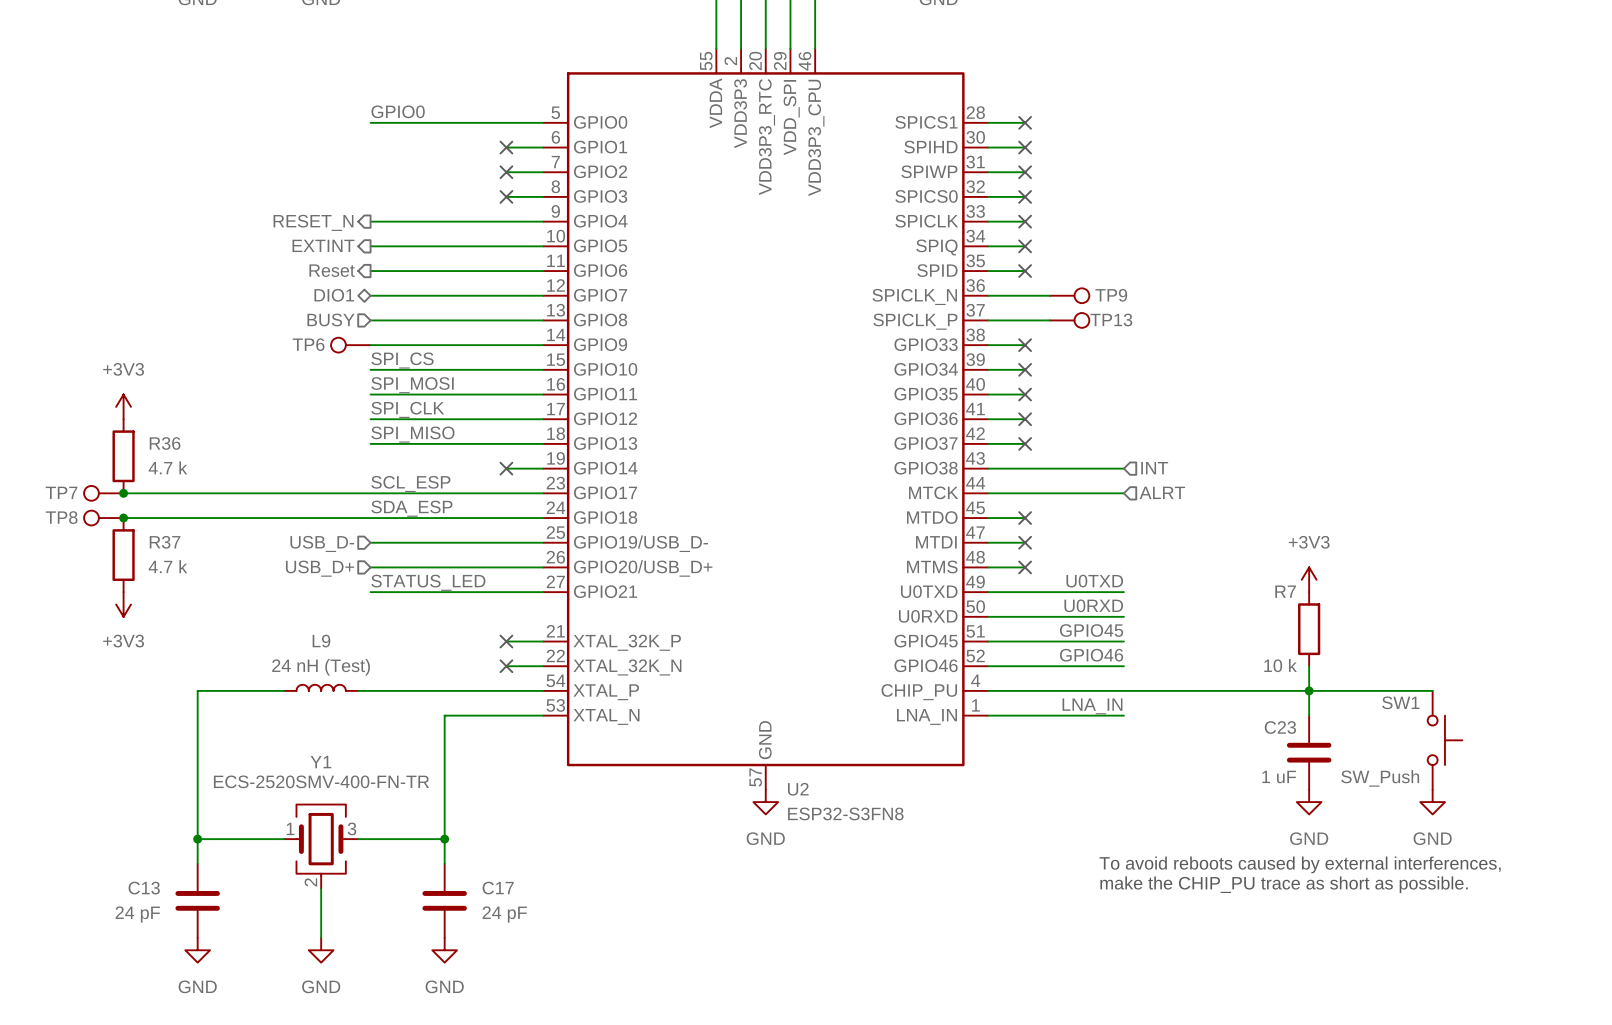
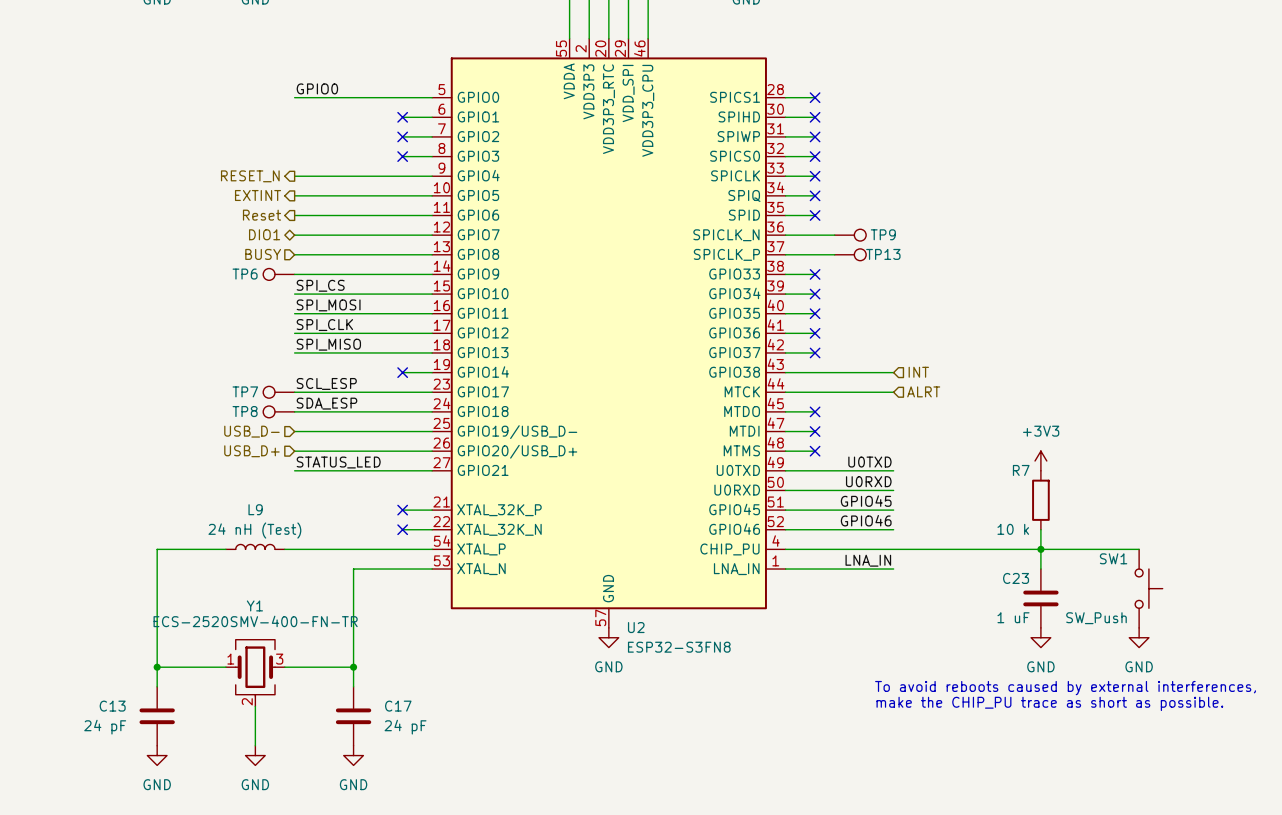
power symbol: +3V3 (123, 406) -> none
R36: 4.7 k (123, 456) -> none
TP7 position: (103, 493) -> (278, 392)
wire: (123, 493) (370, 493) -> none
junction: (123, 493) -> none
TP8 position: (103, 518) -> (278, 411)
wire: (123, 518) (370, 518) -> none
junction: (123, 518) -> none
R37: 4.7 k (123, 555) -> none
power symbol: +3V3 (123, 604) -> none

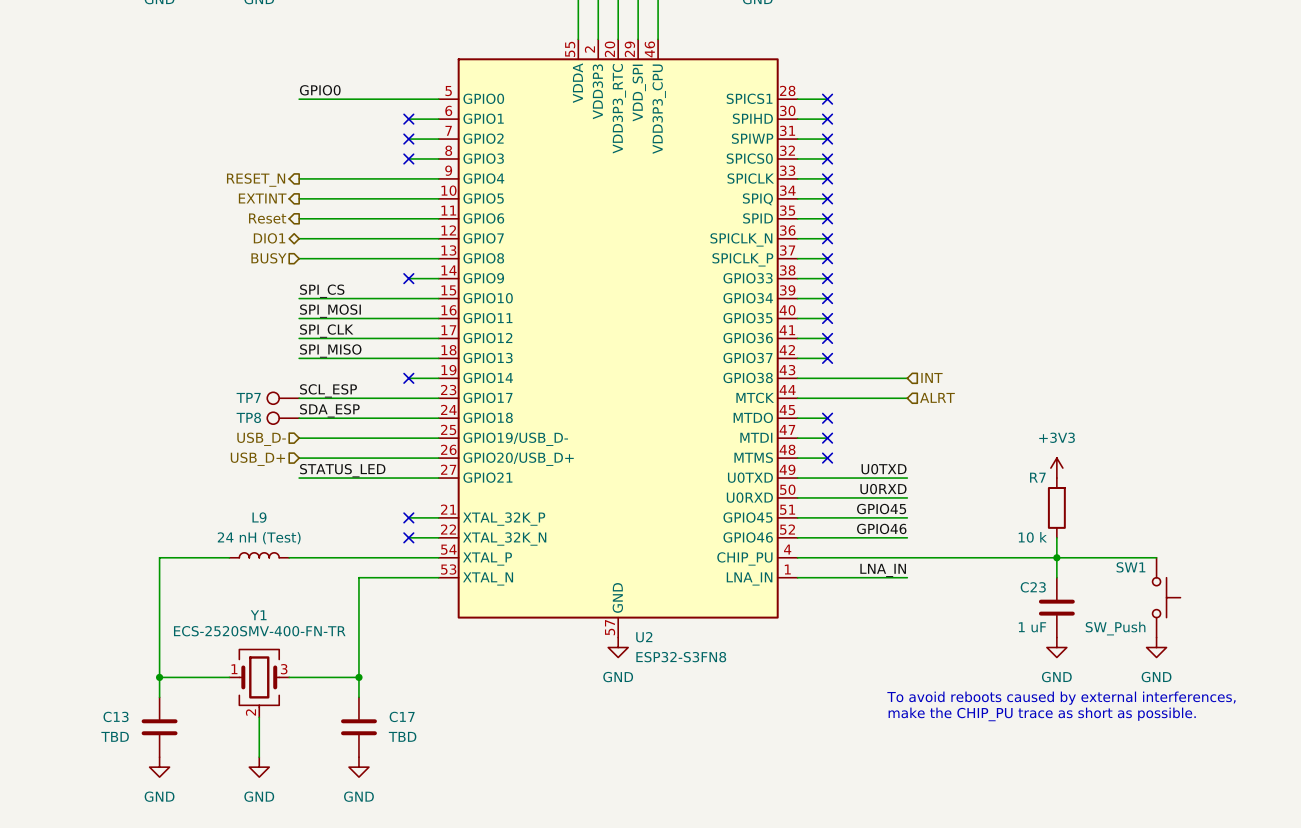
wire: (815, 235) (834, 235) -> none
no-connect mark: none -> (827, 238)
TP9: (850, 235) -> none
wire: (815, 254) (834, 254) -> none
no-connect mark: none -> (827, 258)
TP13: (850, 254) -> none
TP6: (278, 274) -> none
wire: (294, 274) (402, 274) -> none
no-connect mark: none -> (408, 278)
C13 value: 24 pF (105, 727) -> TBD (115, 736)
C17 value: 24 pF (405, 727) -> TBD (402, 736)

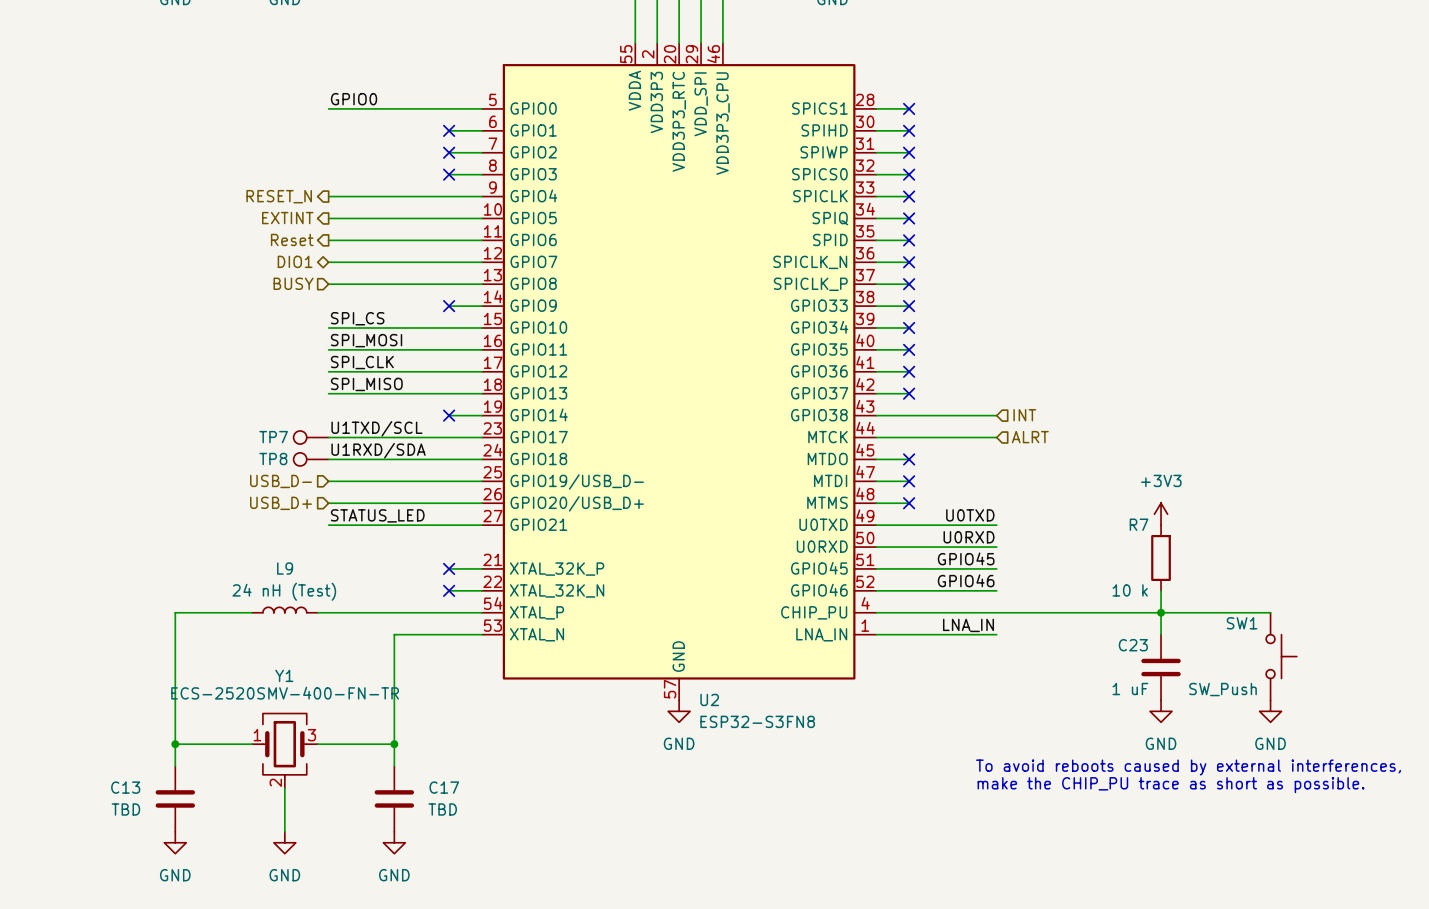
label: SCL_ESP (328, 390) -> U1TXD/SCL (376, 428)
label: SDA_ESP (329, 410) -> U1RXD/SDA (378, 450)

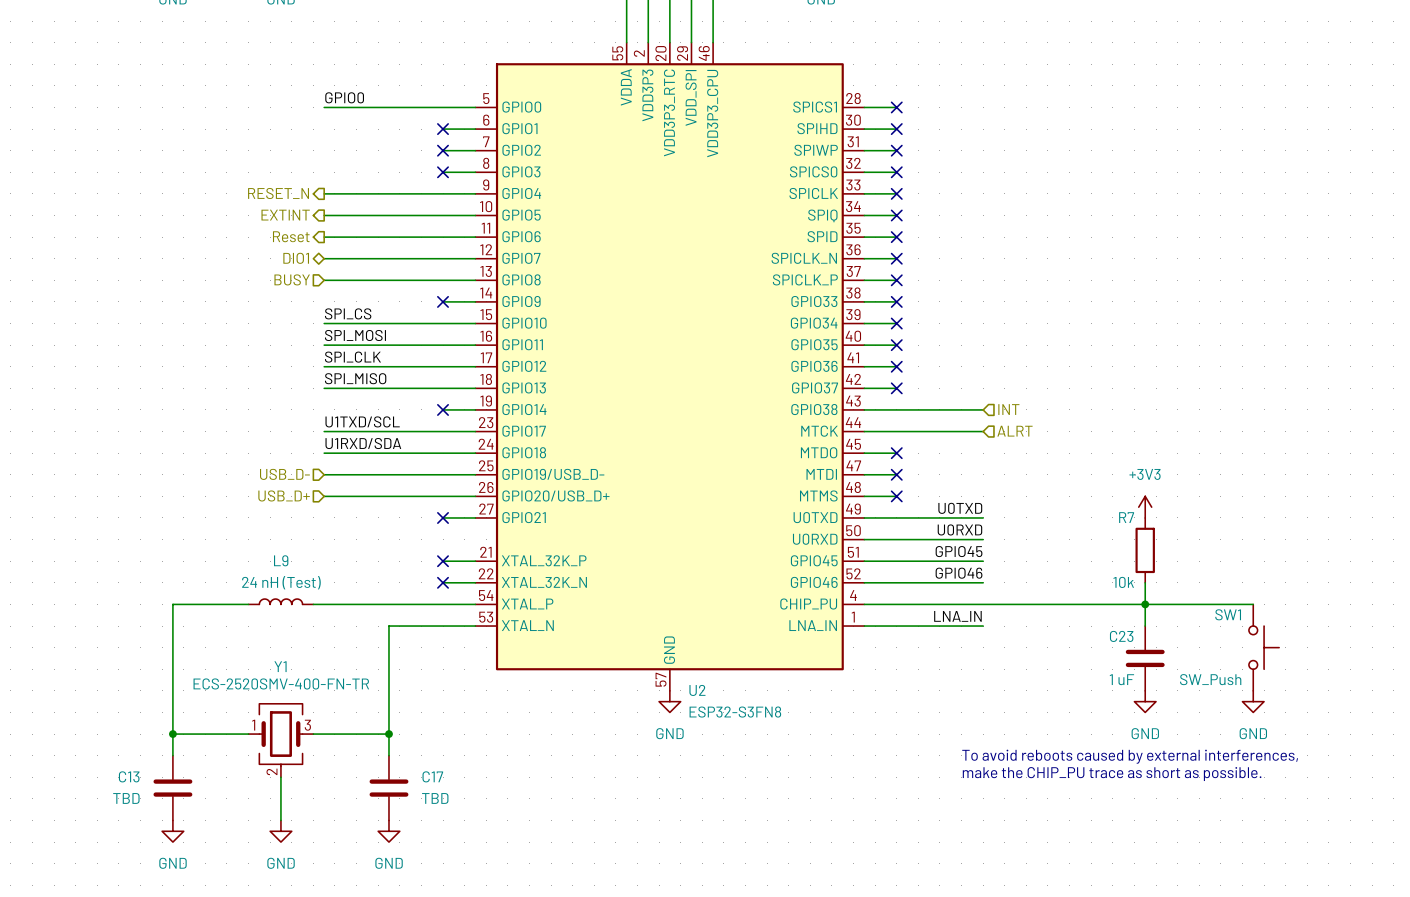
TP7: (311, 437) -> none
TP8: (311, 459) -> none
label: STATUS_LED (377, 515) -> none
wire: (328, 525) (449, 525) -> none
no-connect mark: none -> (443, 517)
R7 value: 10 k (1130, 590) -> 10k (1123, 582)

